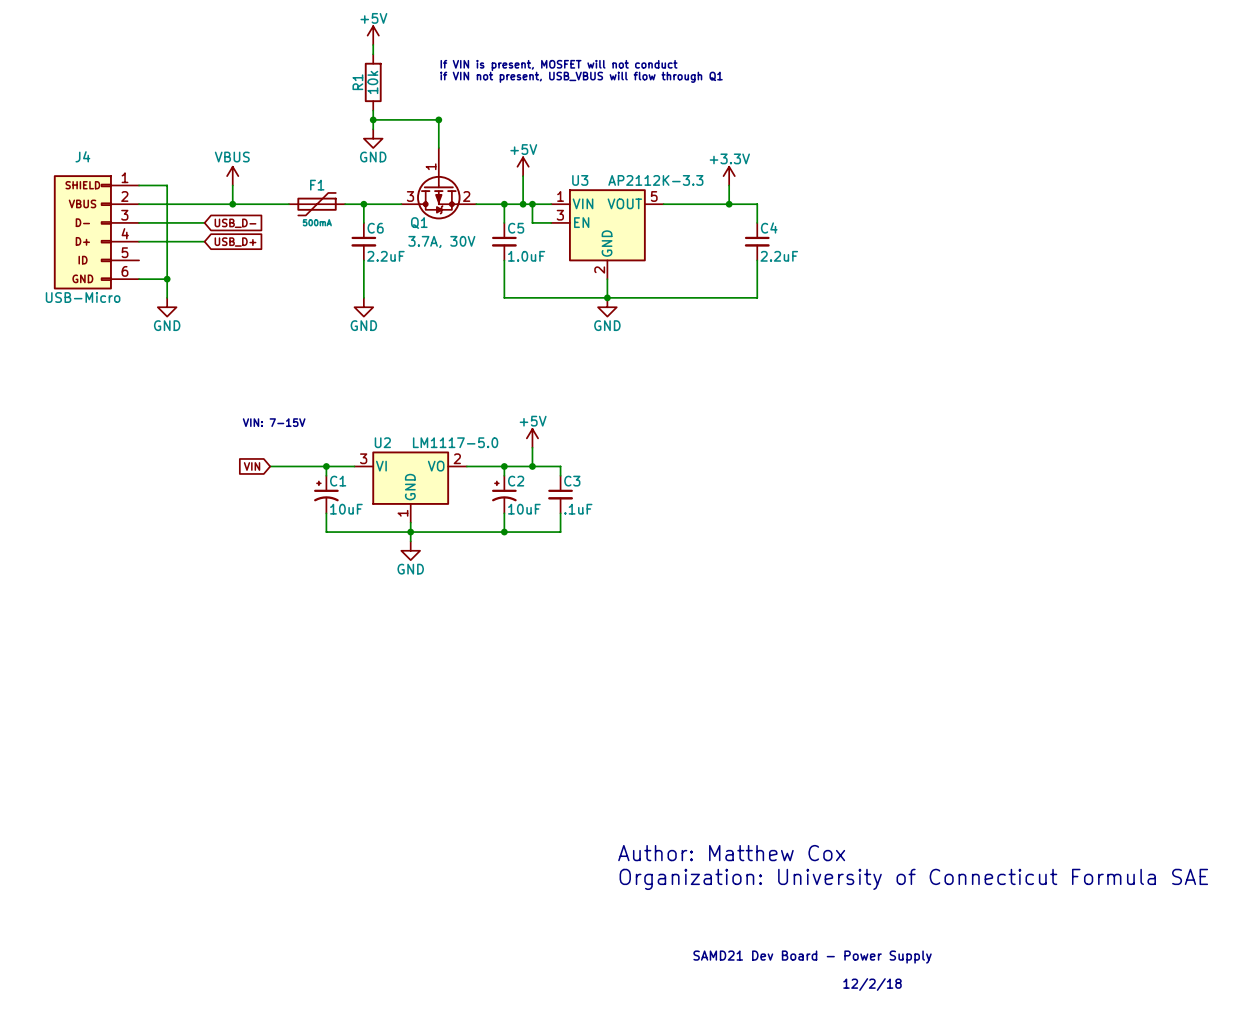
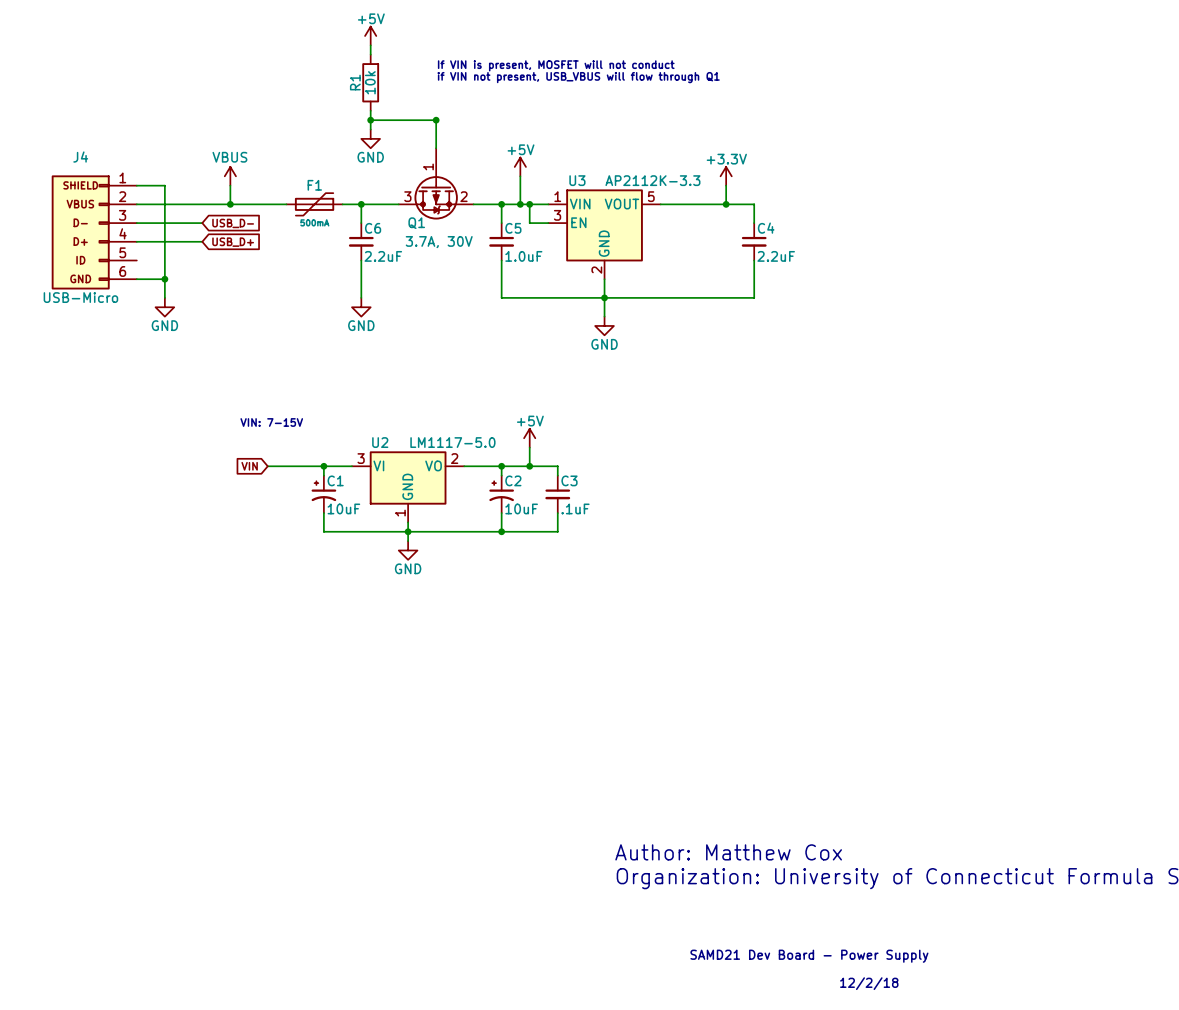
power symbol position: GND (607, 307) -> GND (604, 325)

